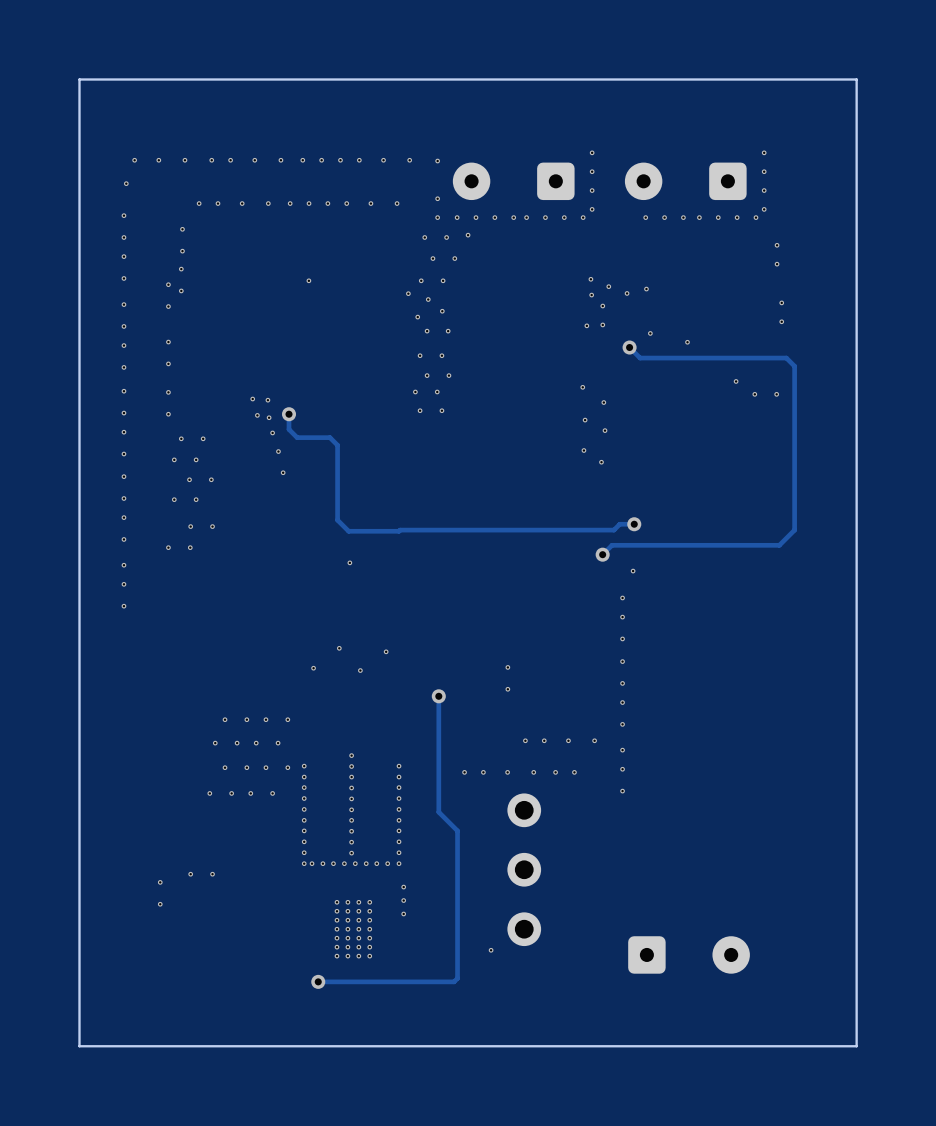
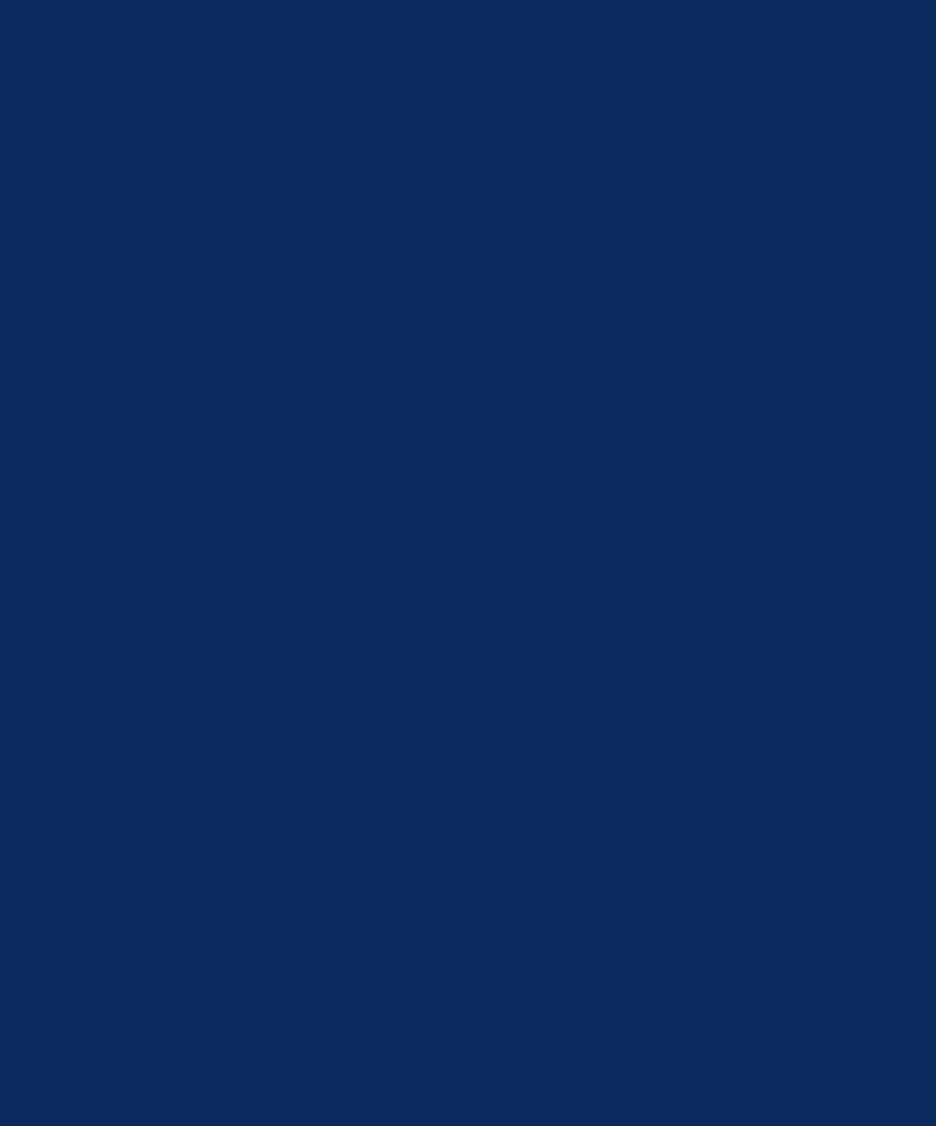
board edge: (856, 79) (79, 79) (79, 1046) (856, 1046) (856, 79) -> none
via: (592, 152) -> none
via: (764, 152) -> none
via: (134, 160) -> none
via: (158, 160) -> none
via: (184, 160) -> none
via: (211, 160) -> none
via: (230, 160) -> none
via: (254, 160) -> none
via: (280, 160) -> none
via: (302, 160) -> none
via: (321, 160) -> none
via: (340, 160) -> none
via: (359, 160) -> none
via: (383, 160) -> none
via: (409, 160) -> none
via: (437, 161) -> none
via: (592, 171) -> none
via: (764, 171) -> none
part: (513, 181) -> none
part: (685, 181) -> none
via: (126, 183) -> none
via: (592, 190) -> none
via: (764, 190) -> none
via: (437, 198) -> none
via: (199, 203) -> none
via: (217, 203) -> none
via: (242, 203) -> none
via: (268, 203) -> none
via: (290, 203) -> none
via: (309, 203) -> none
via: (327, 203) -> none
via: (346, 203) -> none
via: (370, 203) -> none
via: (397, 203) -> none
via: (592, 209) -> none
via: (764, 209) -> none
via: (123, 215) -> none
via: (437, 217) -> none
via: (457, 217) -> none
via: (476, 217) -> none
via: (494, 217) -> none
via: (513, 217) -> none
via: (526, 217) -> none
via: (545, 217) -> none
via: (564, 217) -> none
via: (583, 217) -> none
via: (645, 217) -> none
via: (664, 217) -> none
via: (683, 217) -> none
via: (699, 217) -> none
via: (718, 217) -> none
via: (737, 217) -> none
via: (755, 217) -> none
via: (182, 229) -> none
via: (468, 235) -> none
via: (123, 237) -> none
via: (424, 237) -> none
via: (446, 237) -> none
via: (777, 245) -> none
via: (182, 251) -> none
via: (123, 256) -> none
via: (432, 258) -> none
via: (454, 258) -> none
via: (777, 264) -> none
via: (181, 269) -> none
via: (123, 278) -> none
via: (590, 279) -> none
via: (308, 280) -> none
via: (421, 280) -> none
via: (443, 280) -> none
via: (168, 284) -> none
via: (608, 286) -> none
via: (646, 289) -> none
via: (181, 290) -> none
via: (408, 293) -> none
via: (627, 293) -> none
via: (591, 295) -> none
via: (428, 299) -> none
via: (781, 302) -> none
via: (123, 304) -> none
via: (168, 306) -> none
via: (602, 306) -> none
via: (442, 311) -> none
via: (417, 317) -> none
via: (781, 321) -> none
via: (602, 324) -> none
via: (586, 325) -> none
via: (123, 326) -> none
via: (427, 331) -> none
via: (448, 331) -> none
via: (650, 333) -> none
via: (168, 342) -> none
via: (687, 342) -> none
via: (123, 345) -> none
track: (629, 347) (640, 358) (786, 358) (794, 366) (794, 530) (779, 545) (612, 545) (602, 554) -> none
via: (629, 347) -> none
via: (420, 355) -> none
via: (441, 355) -> none
via: (168, 363) -> none
via: (123, 367) -> none
via: (427, 375) -> none
via: (448, 375) -> none
via: (736, 381) -> none
via: (582, 387) -> none
via: (123, 391) -> none
via: (415, 391) -> none
via: (437, 391) -> none
via: (168, 392) -> none
via: (754, 394) -> none
via: (776, 394) -> none
via: (252, 399) -> none
via: (267, 400) -> none
via: (603, 402) -> none
via: (420, 410) -> none
via: (441, 410) -> none
via: (123, 413) -> none
via: (168, 414) -> none
track: (288, 414) (288, 429) (297, 437) (329, 437) (337, 445) (337, 520) (348, 531) (613, 530) (619, 524) (634, 524) -> none
via: (288, 414) -> none
via: (257, 415) -> none
via: (269, 417) -> none
via: (585, 420) -> none
via: (605, 430) -> none
via: (123, 432) -> none
via: (272, 432) -> none
via: (181, 438) -> none
via: (203, 438) -> none
via: (583, 450) -> none
via: (278, 451) -> none
via: (123, 454) -> none
via: (174, 459) -> none
via: (196, 459) -> none
via: (601, 462) -> none
via: (283, 472) -> none
via: (123, 476) -> none
via: (189, 479) -> none
via: (211, 479) -> none
via: (123, 498) -> none
via: (174, 499) -> none
via: (196, 499) -> none
via: (123, 517) -> none
via: (634, 524) -> none
via: (190, 526) -> none
via: (212, 526) -> none
via: (123, 539) -> none
via: (168, 547) -> none
via: (190, 547) -> none
via: (602, 554) -> none
via: (349, 562) -> none
via: (123, 565) -> none
via: (633, 571) -> none
via: (123, 584) -> none
via: (622, 597) -> none
via: (123, 606) -> none
via: (622, 617) -> none
via: (622, 638) -> none
via: (339, 648) -> none
via: (386, 651) -> none
via: (622, 661) -> none
via: (507, 667) -> none
via: (313, 668) -> none
via: (360, 670) -> none
via: (622, 683) -> none
via: (507, 689) -> none
track: (438, 696) (438, 812) (457, 830) (457, 978) (454, 981) (318, 981) -> none
via: (438, 696) -> none
via: (622, 702) -> none
via: (225, 719) -> none
via: (246, 719) -> none
via: (265, 719) -> none
via: (287, 719) -> none
via: (622, 724) -> none
via: (525, 740) -> none
via: (544, 740) -> none
via: (568, 740) -> none
via: (594, 740) -> none
via: (215, 743) -> none
via: (237, 743) -> none
via: (256, 743) -> none
via: (278, 743) -> none
via: (622, 750) -> none
via: (351, 755) -> none
via: (304, 766) -> none
via: (351, 766) -> none
via: (399, 766) -> none
via: (225, 767) -> none
via: (246, 767) -> none
via: (265, 767) -> none
via: (287, 767) -> none
via: (622, 769) -> none
via: (464, 772) -> none
via: (483, 772) -> none
via: (507, 772) -> none
via: (533, 772) -> none
via: (555, 772) -> none
via: (574, 772) -> none
via: (304, 777) -> none
via: (351, 777) -> none
via: (399, 777) -> none
via: (304, 787) -> none
via: (351, 787) -> none
via: (399, 787) -> none
via: (622, 791) -> none
via: (209, 793) -> none
via: (231, 793) -> none
via: (250, 793) -> none
via: (272, 793) -> none
via: (304, 798) -> none
via: (351, 798) -> none
via: (399, 798) -> none
via: (304, 809) -> none
via: (351, 809) -> none
via: (399, 809) -> none
via: (304, 820) -> none
via: (351, 820) -> none
via: (399, 820) -> none
via: (304, 830) -> none
via: (399, 830) -> none
via: (351, 831) -> none
via: (304, 841) -> none
via: (399, 841) -> none
via: (351, 842) -> none
via: (304, 852) -> none
via: (399, 852) -> none
via: (351, 853) -> none
via: (304, 863) -> none
via: (312, 863) -> none
via: (322, 863) -> none
via: (333, 863) -> none
via: (344, 863) -> none
via: (355, 863) -> none
via: (366, 863) -> none
via: (376, 863) -> none
via: (387, 863) -> none
via: (399, 863) -> none
part: (524, 869) -> none
via: (190, 874) -> none
via: (212, 874) -> none
via: (160, 882) -> none
via: (403, 887) -> none
via: (403, 900) -> none
via: (336, 902) -> none
via: (347, 902) -> none
via: (358, 902) -> none
via: (369, 902) -> none
via: (160, 904) -> none
via: (336, 911) -> none
via: (347, 911) -> none
via: (358, 911) -> none
via: (369, 911) -> none
via: (403, 913) -> none
via: (336, 920) -> none
via: (347, 920) -> none
via: (358, 920) -> none
via: (369, 920) -> none
via: (336, 929) -> none
via: (347, 929) -> none
via: (358, 929) -> none
via: (369, 929) -> none
via: (336, 938) -> none
via: (347, 938) -> none
via: (358, 938) -> none
via: (369, 938) -> none
via: (336, 947) -> none
via: (347, 947) -> none
via: (358, 947) -> none
via: (369, 947) -> none
via: (491, 950) -> none
part: (689, 954) -> none
via: (336, 956) -> none
via: (347, 956) -> none
via: (358, 956) -> none
via: (369, 956) -> none
via: (318, 981) -> none

